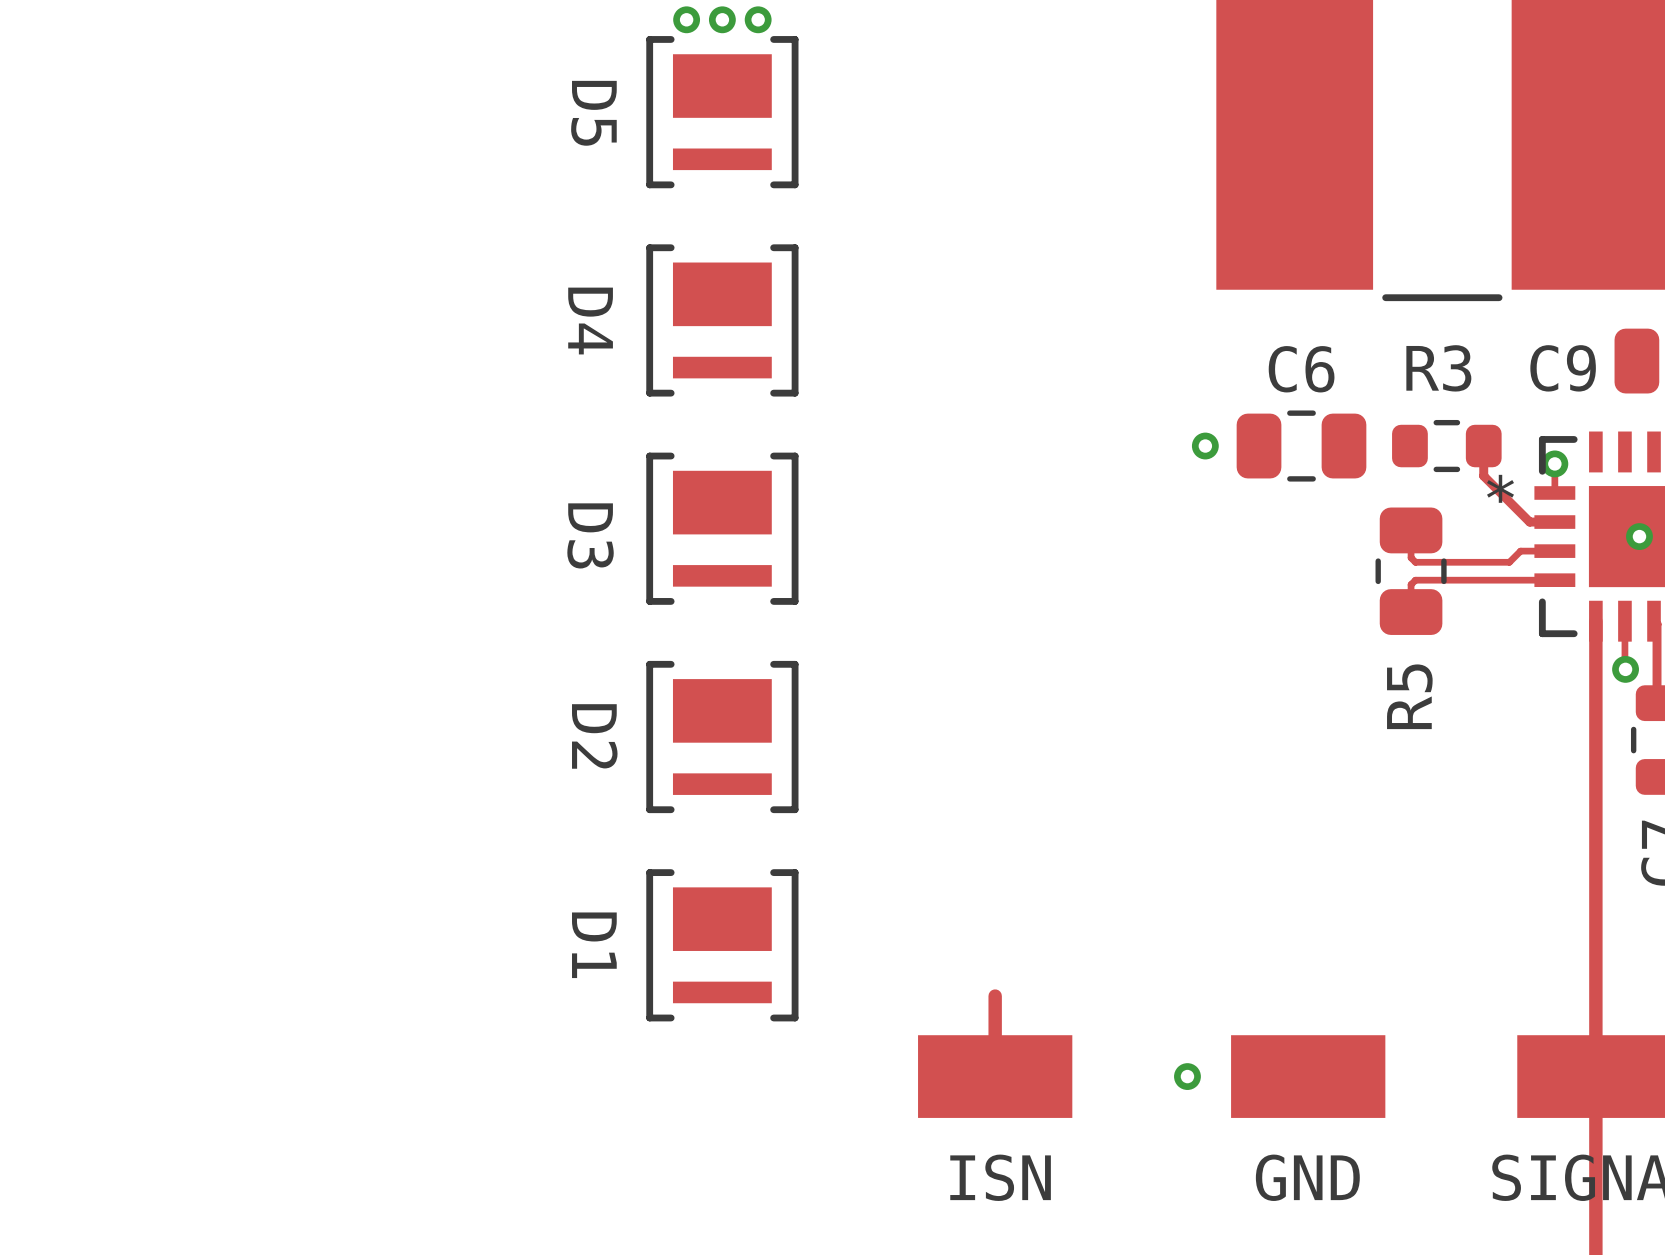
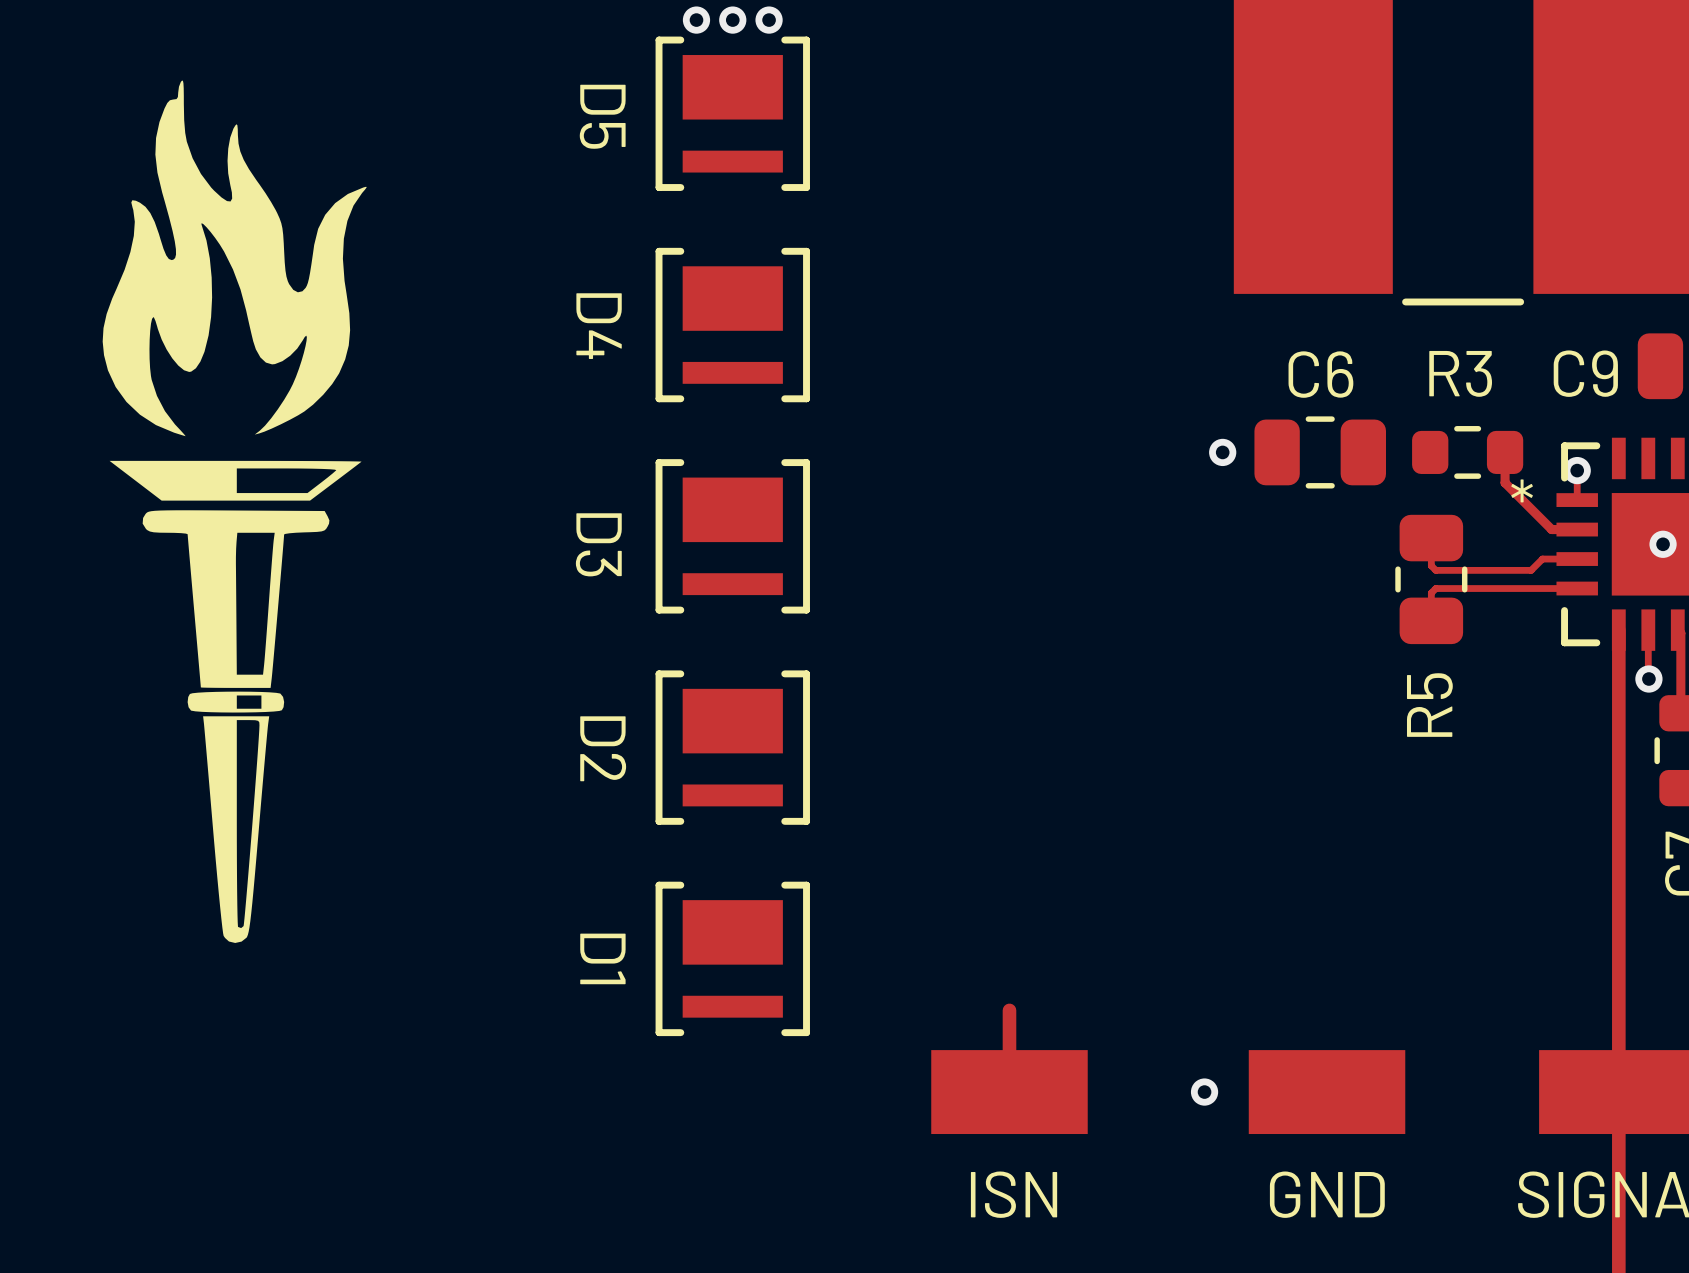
drawing: none -> [102, 80, 367, 943]

